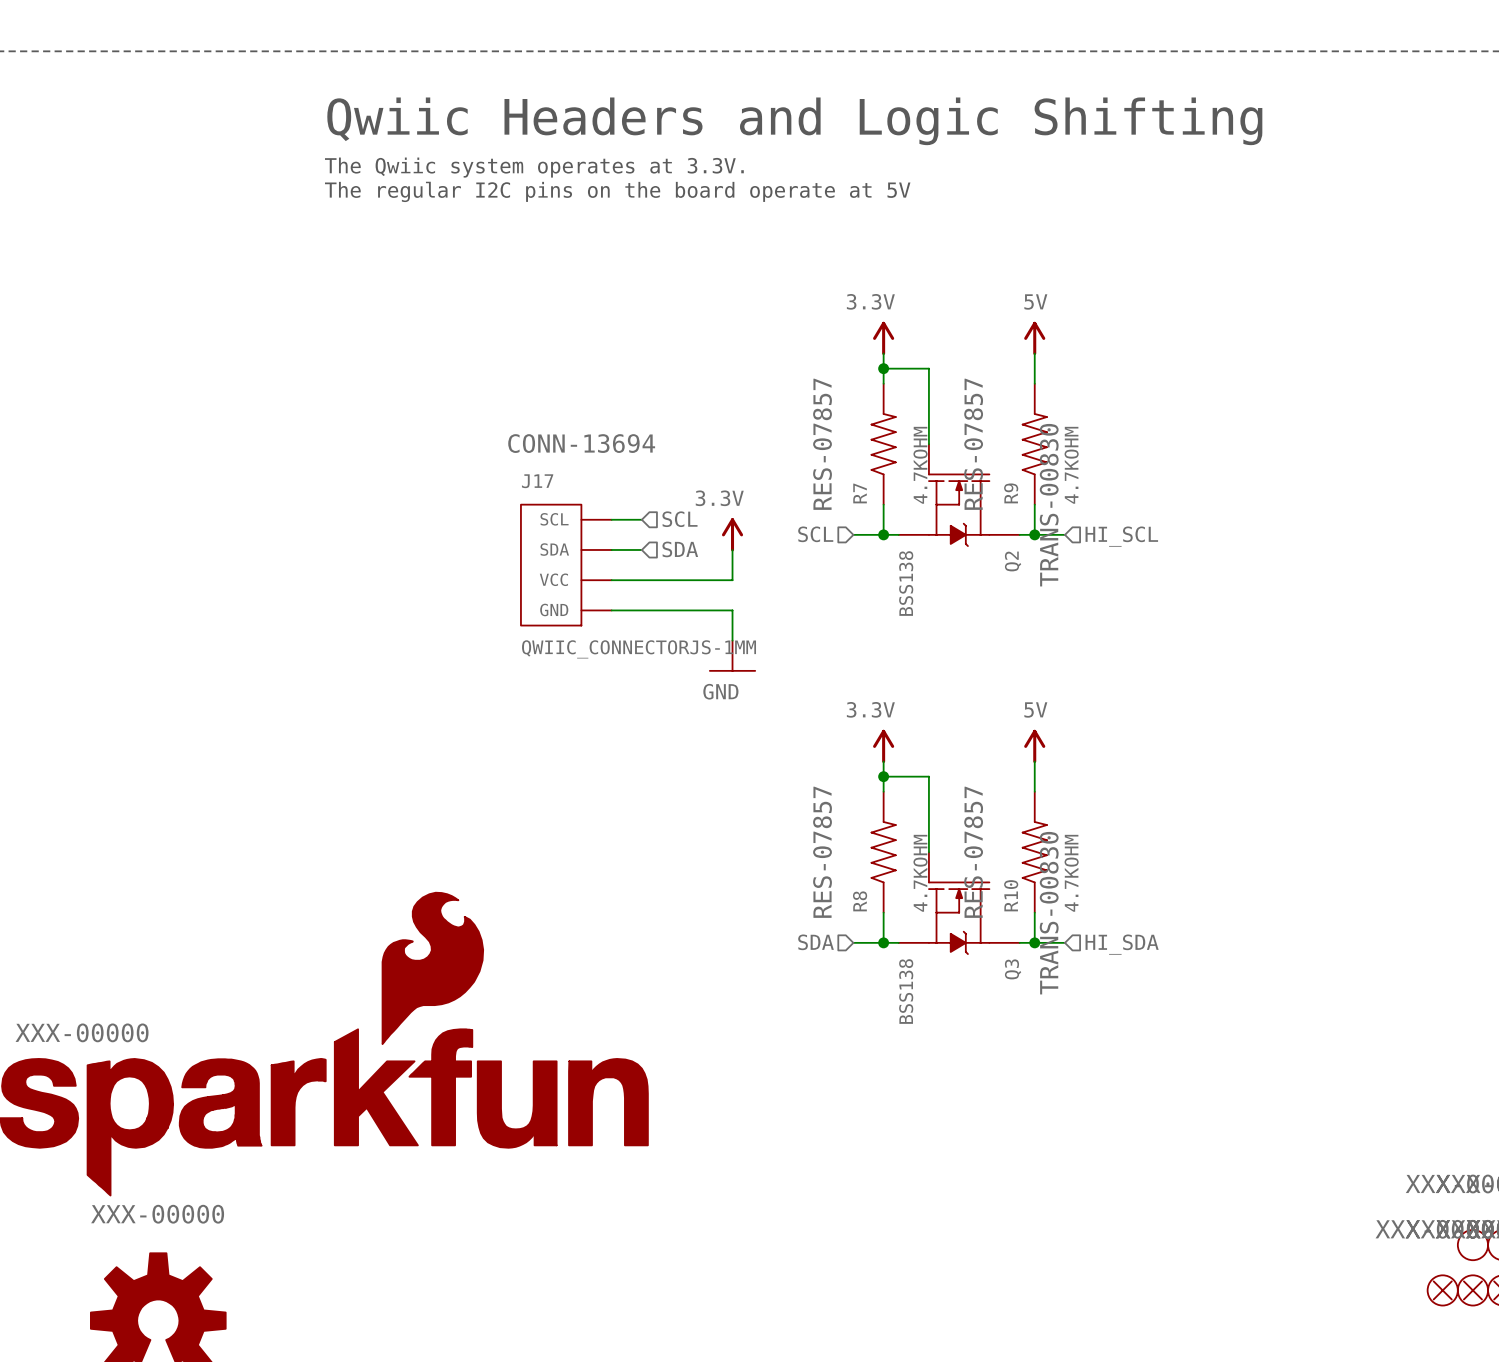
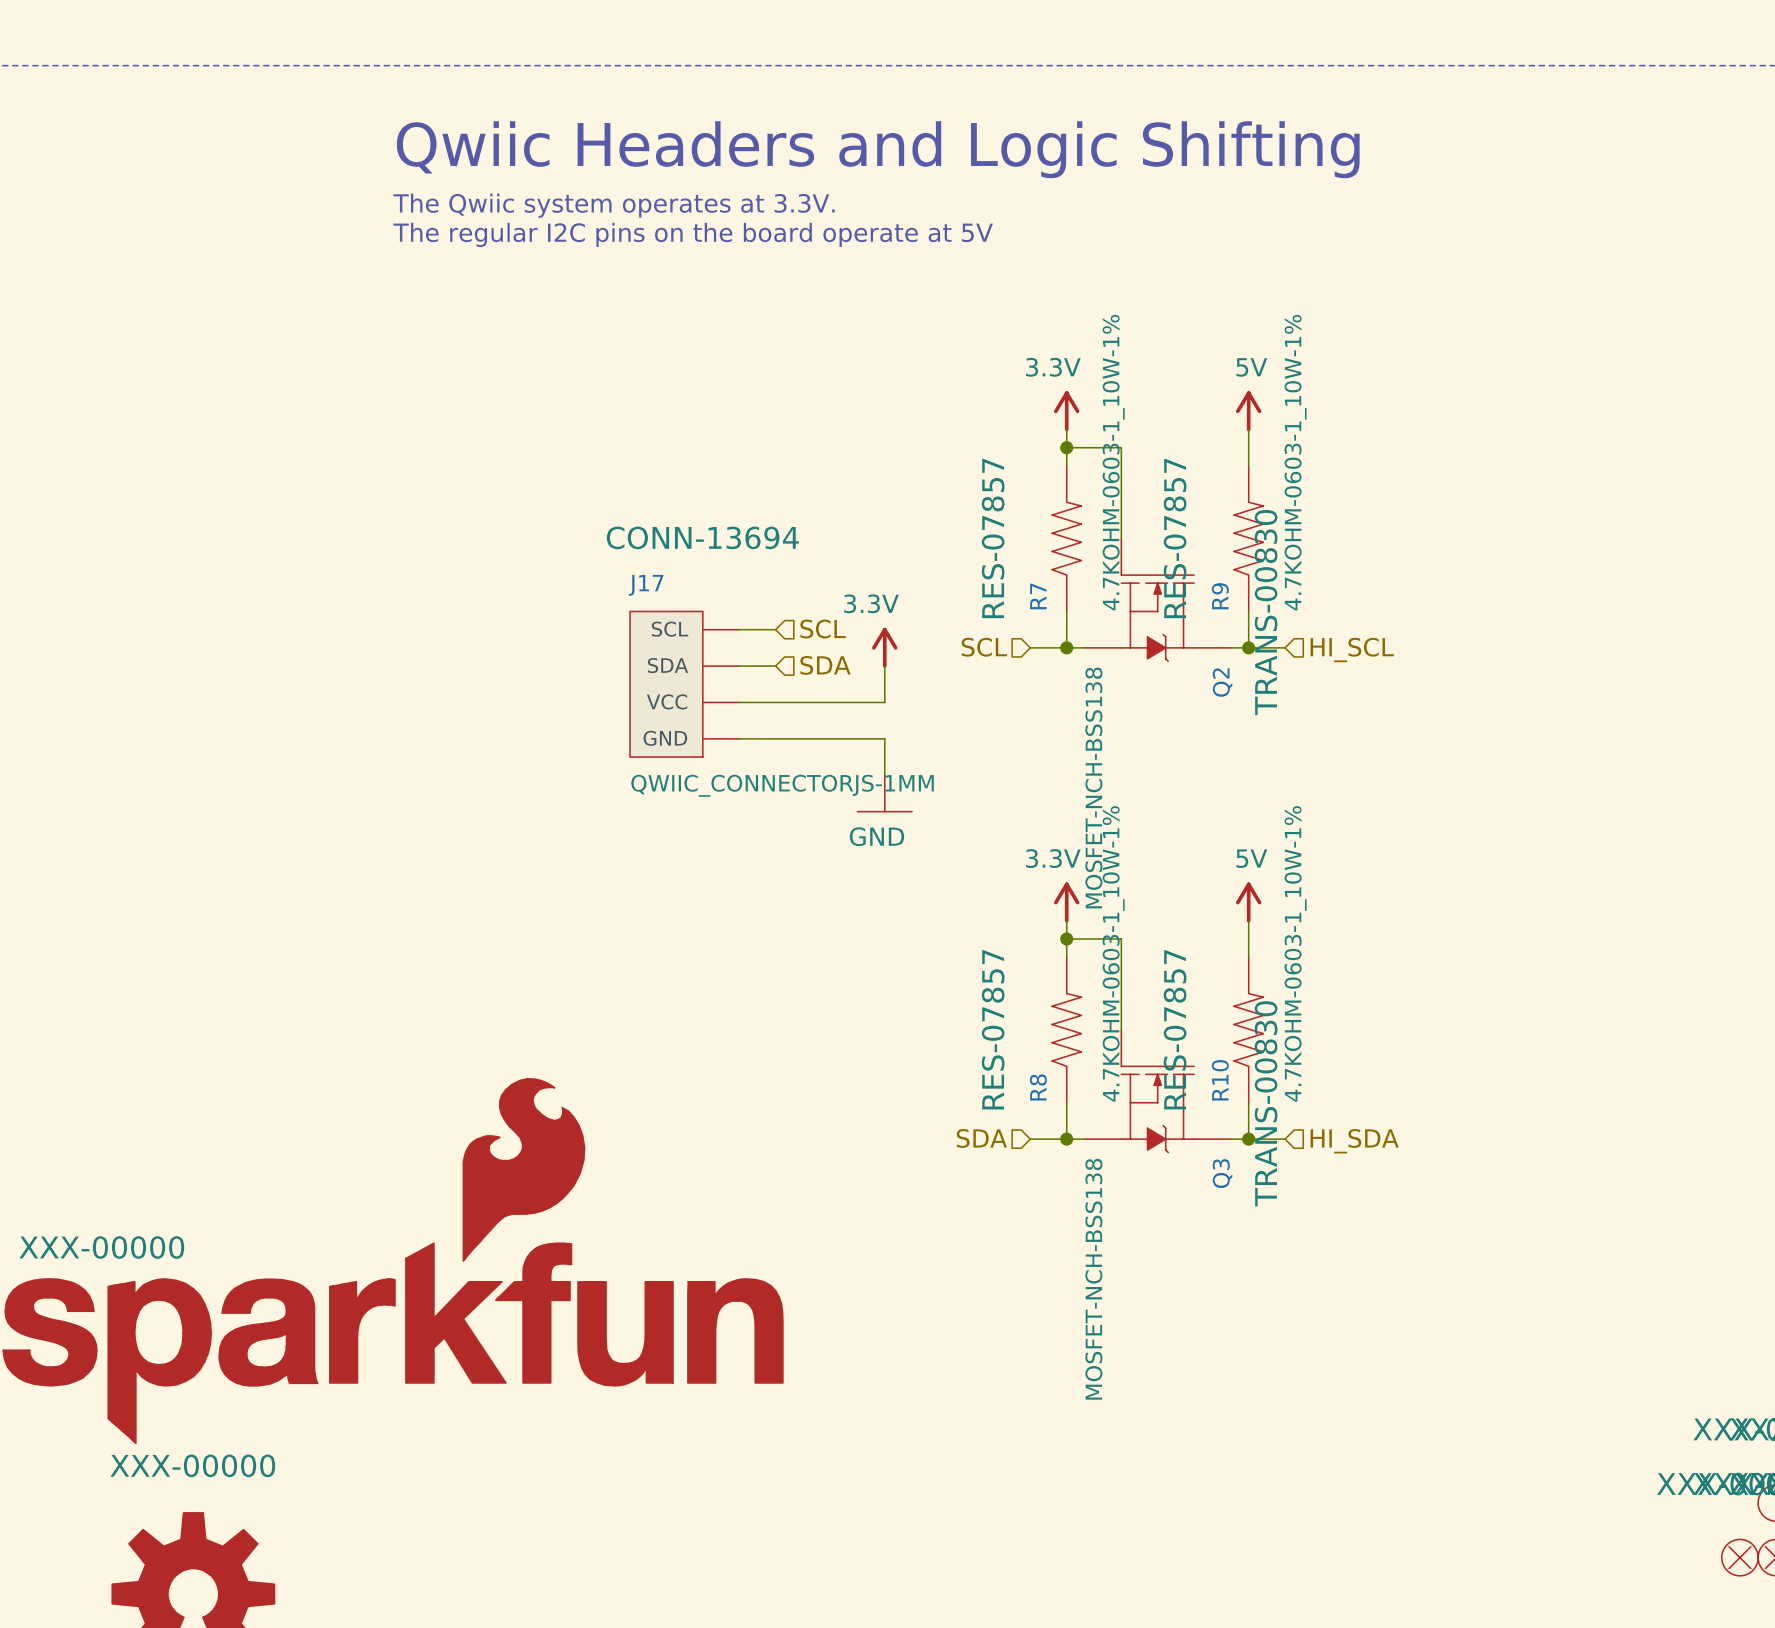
R7 value: 4.7KOHM (920, 465) -> 4.7KOHM-0603-1_10W-1% (1113, 462)
R9 value: 4.7KOHM (1071, 465) -> 4.7KOHM-0603-1_10W-1% (1295, 462)
Q2 value: BSS138 (906, 583) -> MOSFET-NCH-BSS138 (1093, 788)
R8 value: 4.7KOHM (920, 873) -> 4.7KOHM-0603-1_10W-1% (1113, 953)
R10 value: 4.7KOHM (1071, 873) -> 4.7KOHM-0603-1_10W-1% (1295, 953)
Q3 value: BSS138 (906, 991) -> MOSFET-NCH-BSS138 (1093, 1279)

